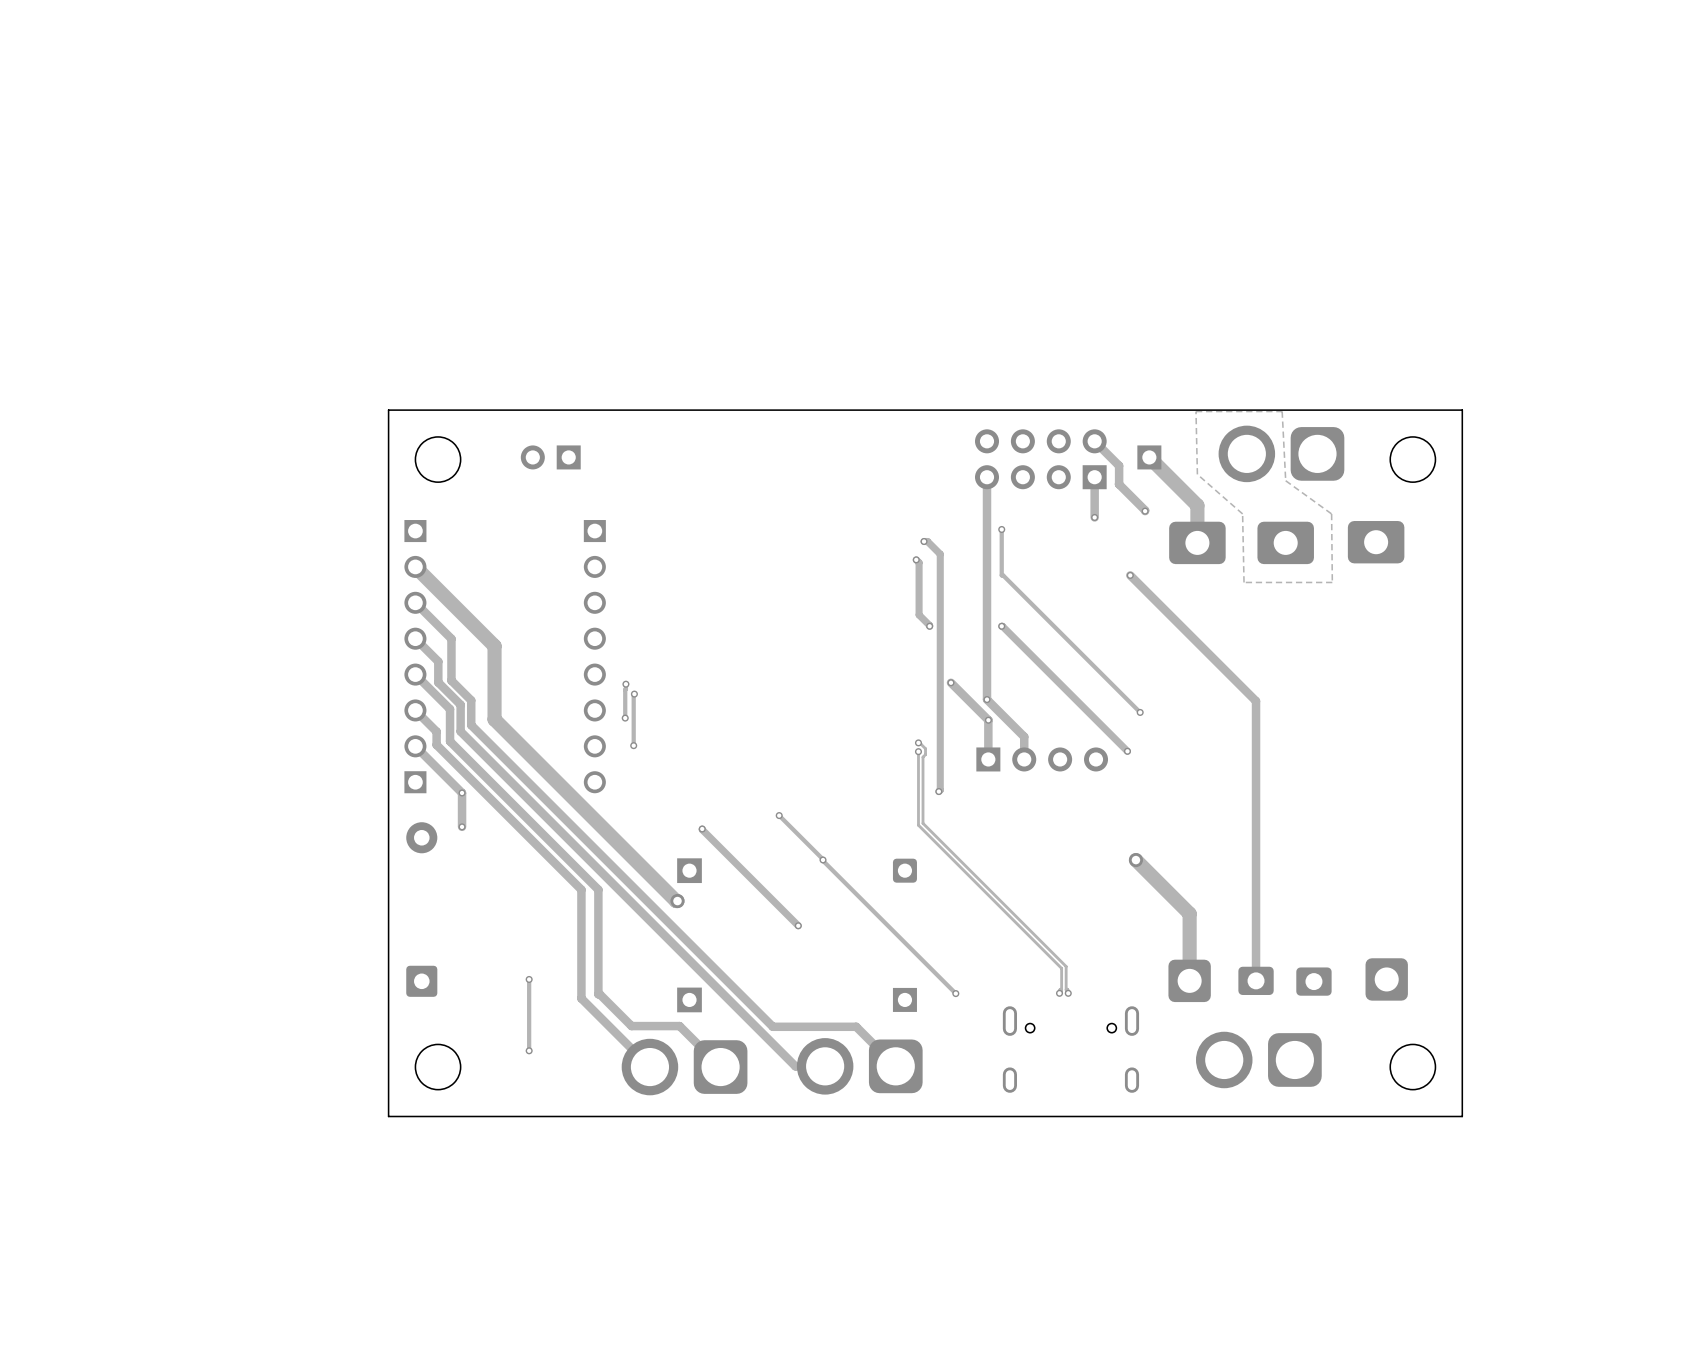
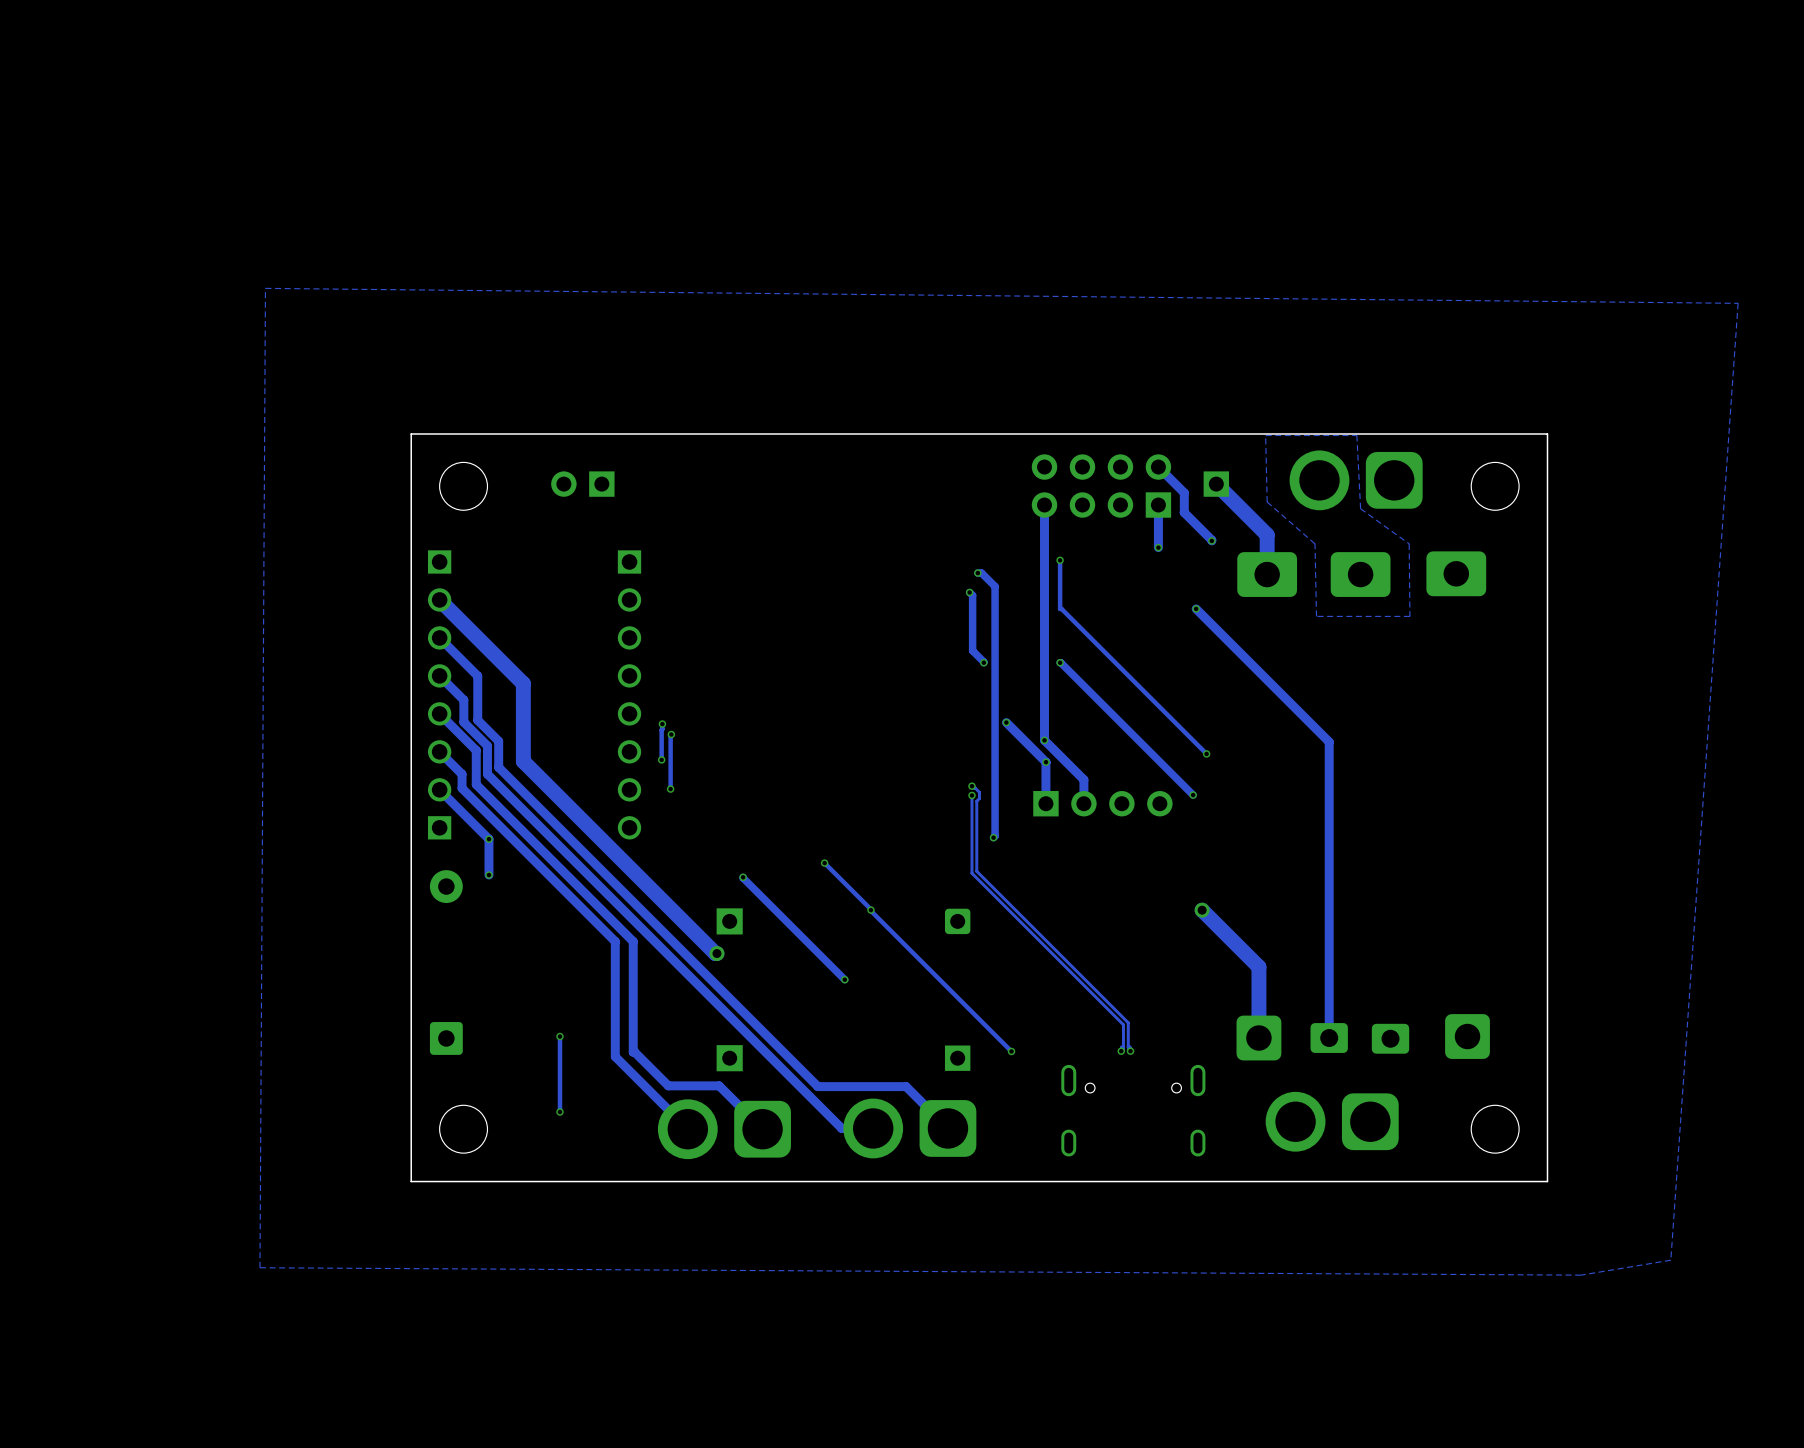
zone outline: none -> (265, 288) (259, 1267) (1581, 1275) (1670, 1260) (1738, 303) (265, 288)

